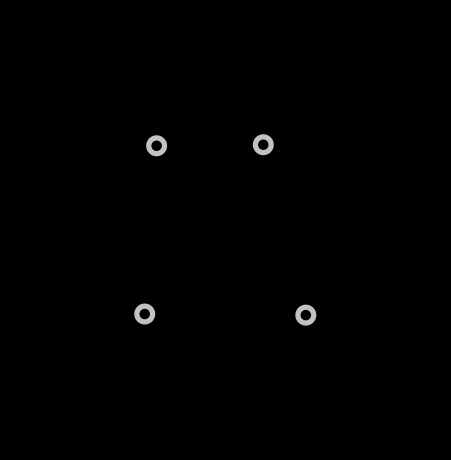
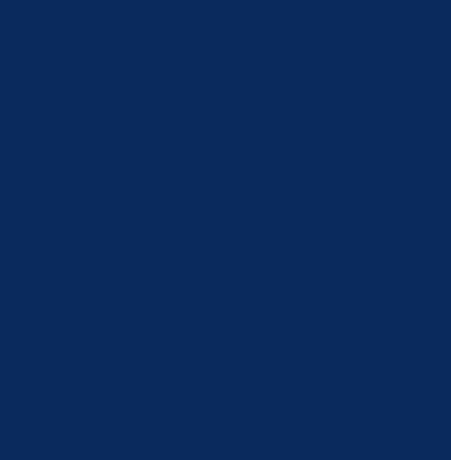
via: (263, 144) -> none
via: (156, 145) -> none
via: (144, 314) -> none
via: (305, 315) -> none

